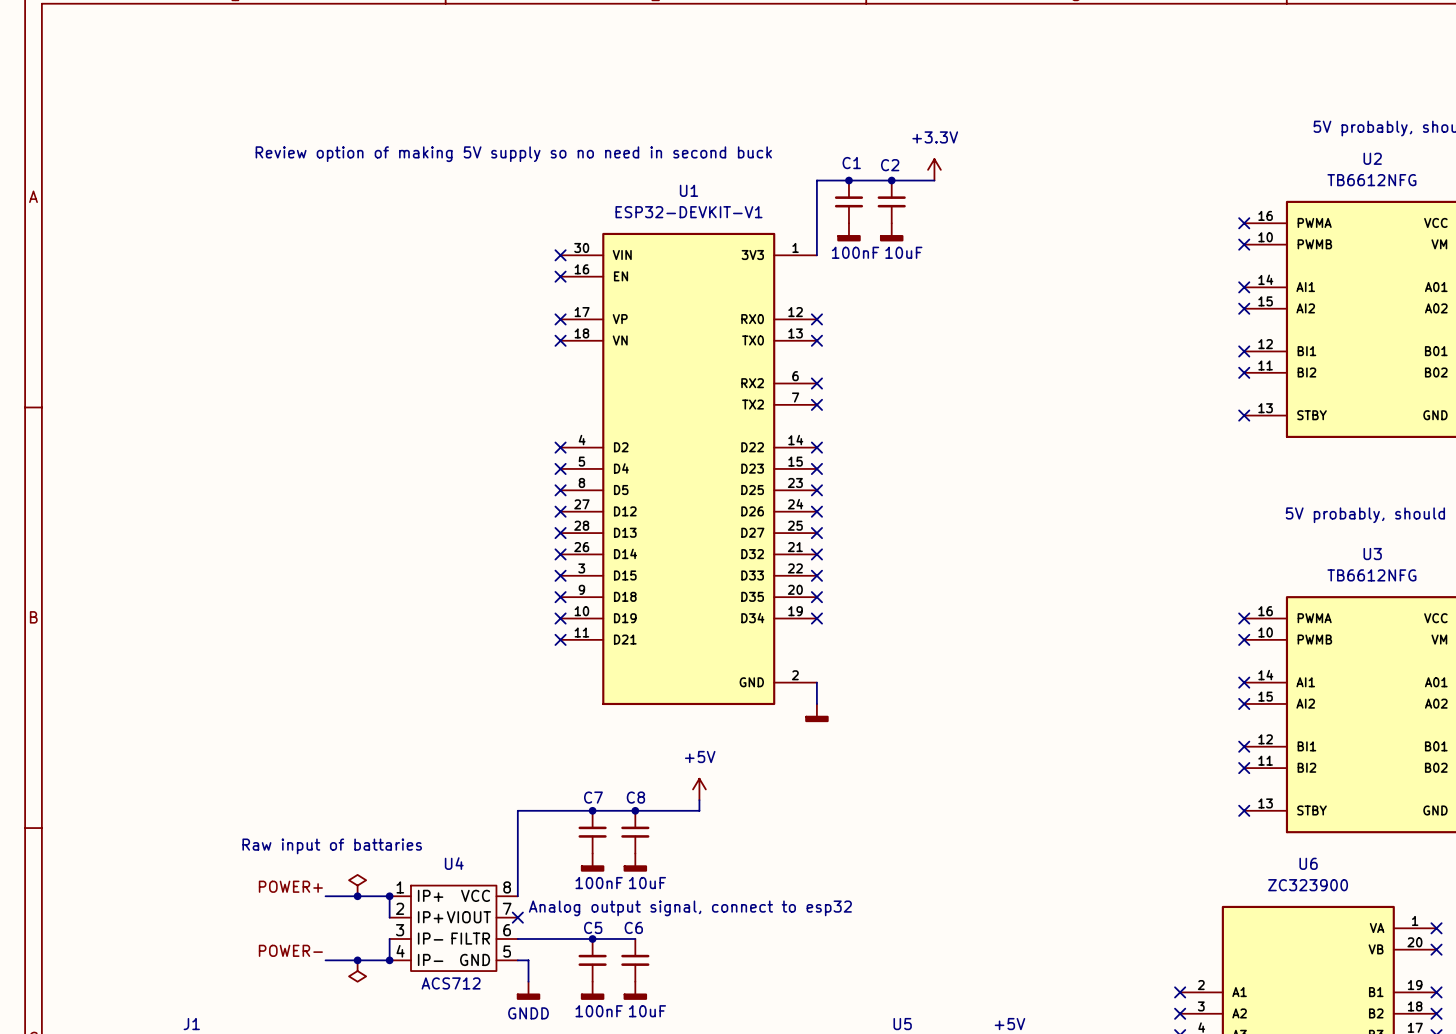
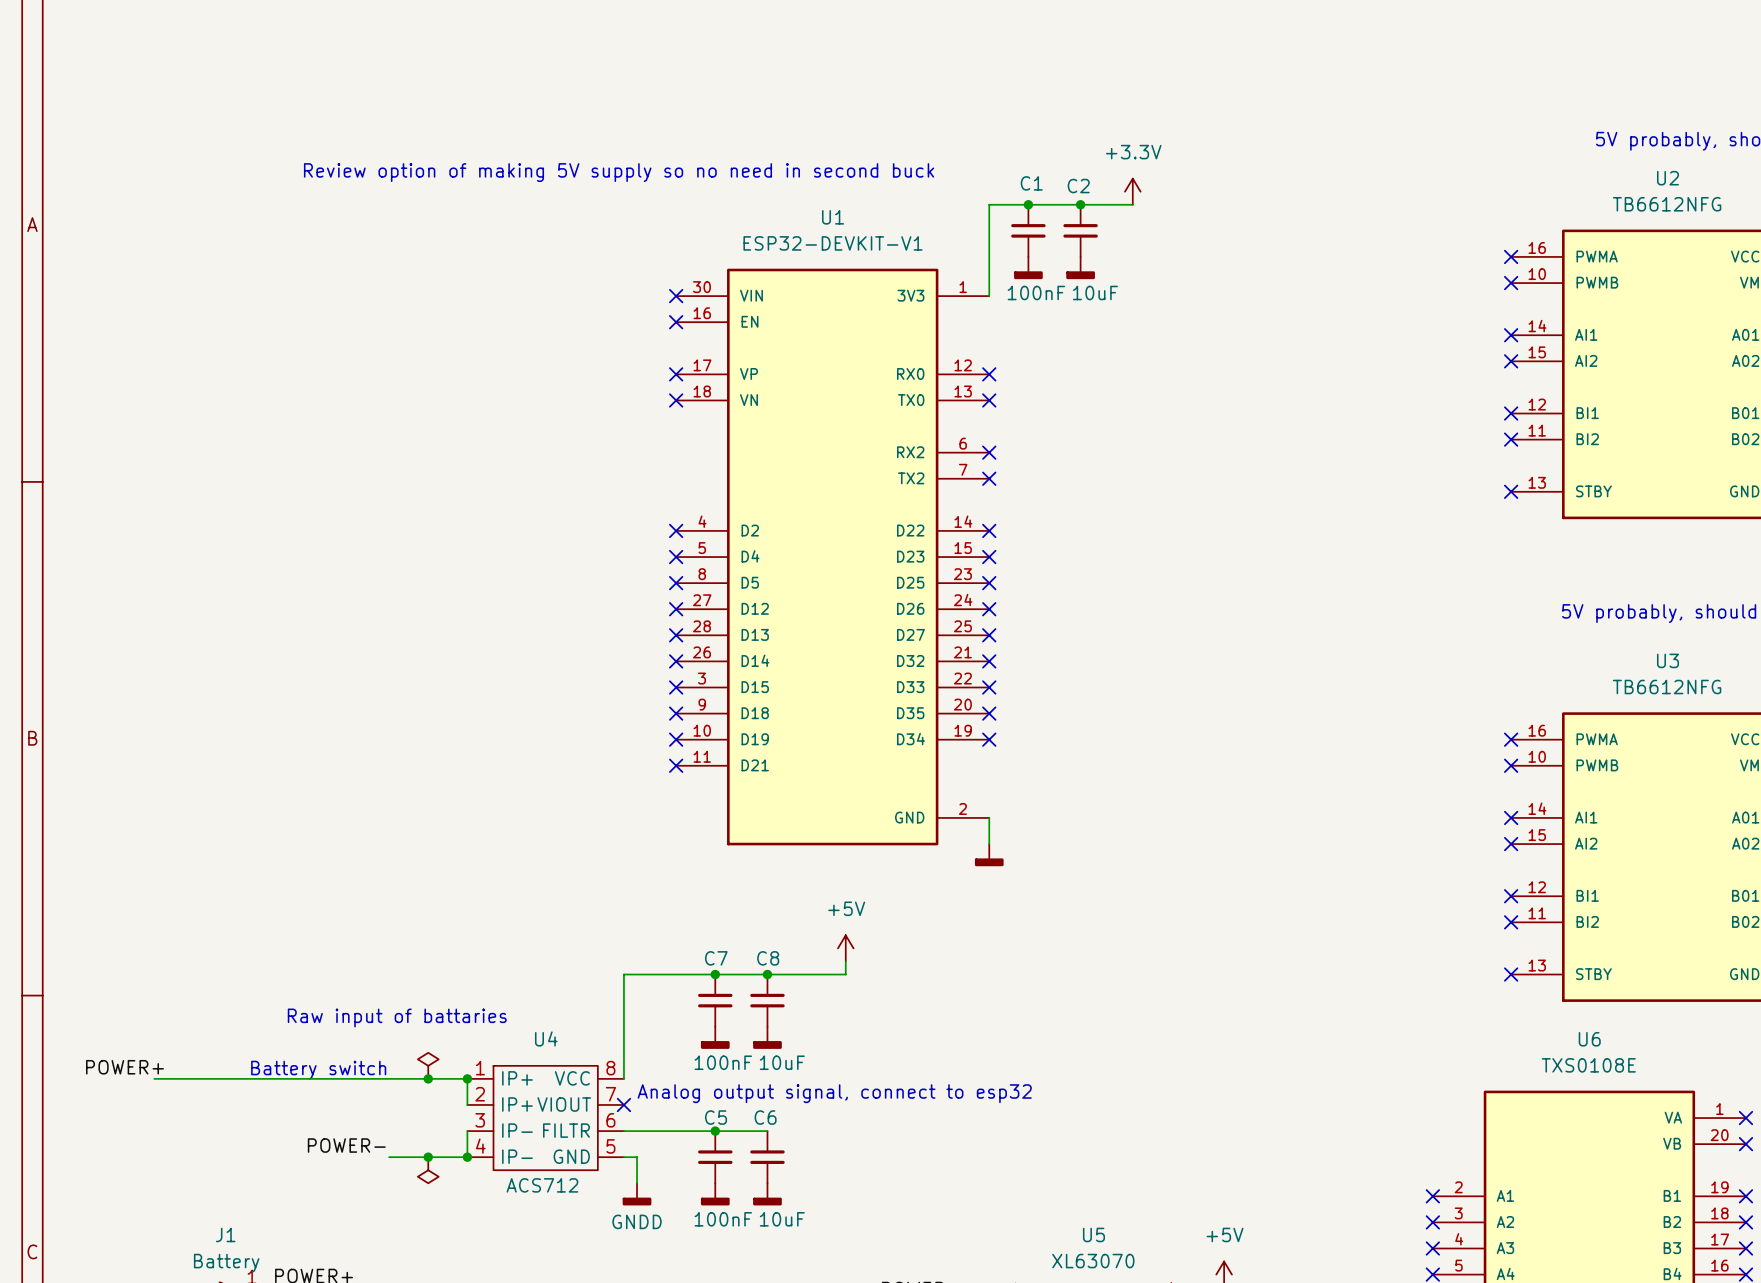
U6 value: ZC323900 (1308, 885) -> TXS0108E (1588, 1065)
label position: POWER+ (290, 886) -> POWER+ (124, 1067)
text: none -> Battery switch (318, 1070)
wire: none -> (154, 1078) (389, 1078)

